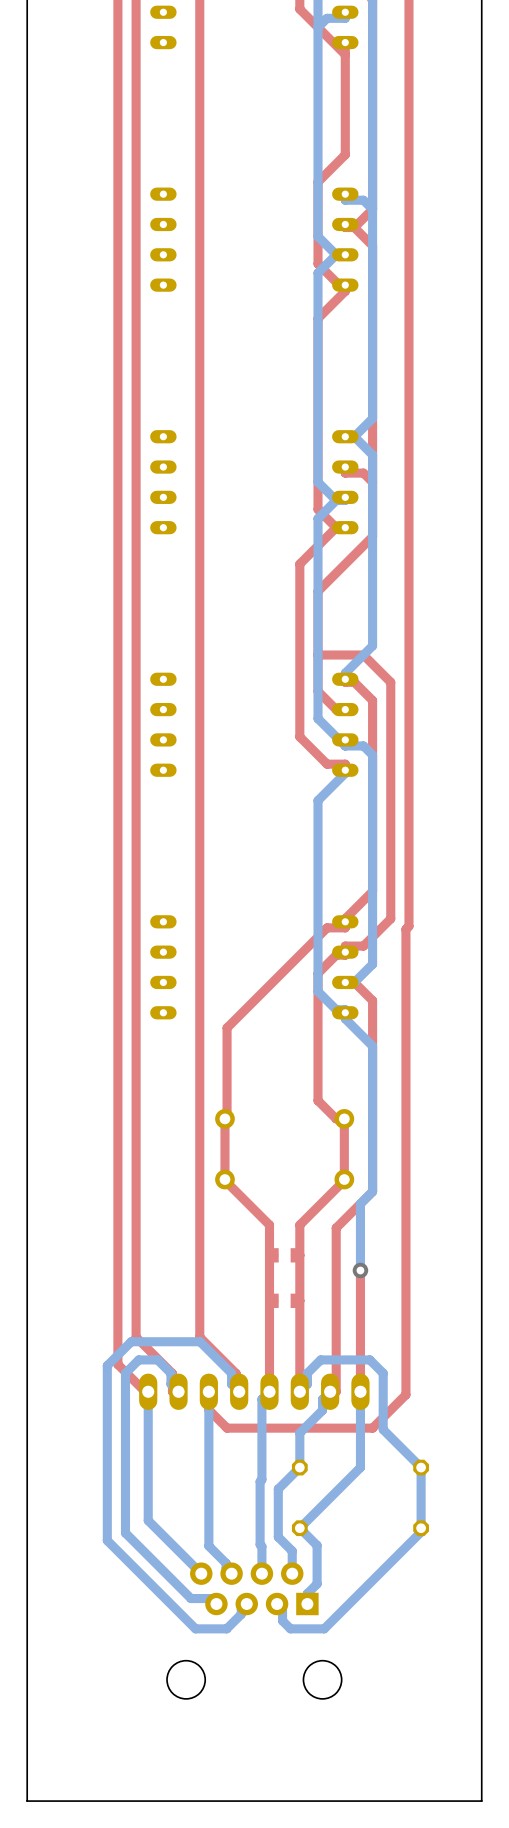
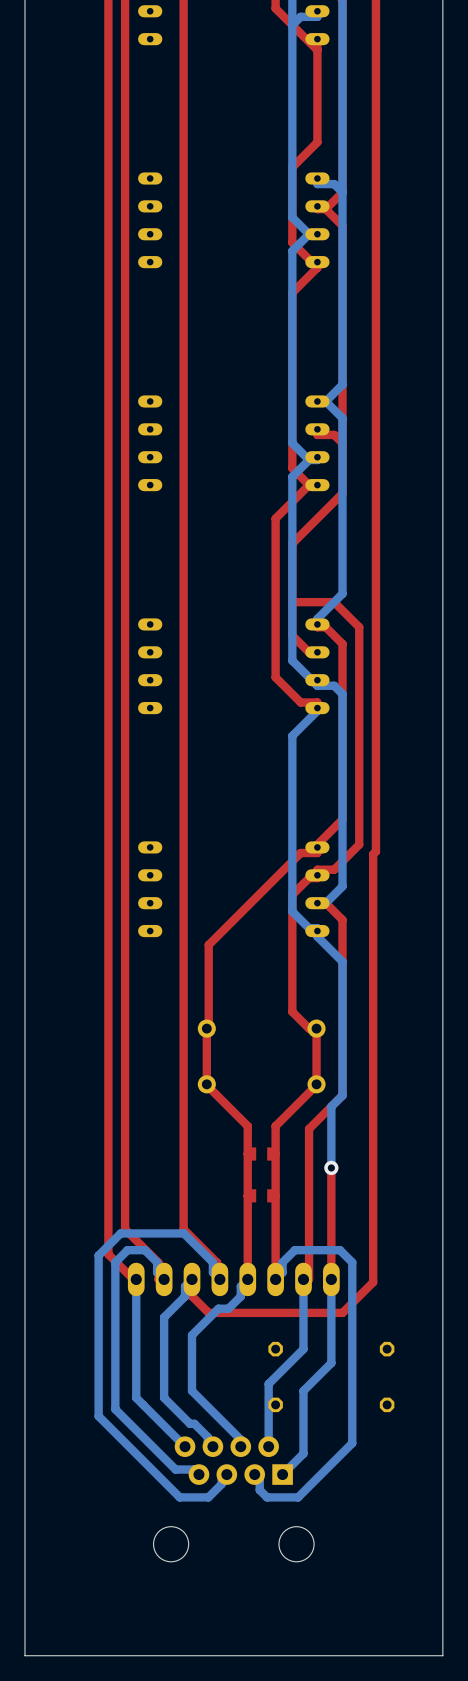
bottom track: (208, 1391) (208, 1452) -> (240, 1296) (228, 1308) (218, 1308) (192, 1335)
bottom track: none -> (192, 1279) (185, 1286) (185, 1296) (164, 1317) (164, 1397) (190, 1423) (194, 1423)
bottom track: (330, 1391) (322, 1399) (322, 1410) (299, 1433) (299, 1467) (278, 1489) (278, 1537) (292, 1551) -> (303, 1279) (303, 1349) (268, 1383) (268, 1425)
bottom track: (261, 1410) (261, 1479) (260, 1481) (261, 1566) -> none
bottom track: (383, 1429) (421, 1467) (421, 1532) (383, 1569) -> (352, 1314) (352, 1443)
bottom track: (360, 1467) (299, 1528) (317, 1545) (317, 1583) (307, 1593) (307, 1604) -> (331, 1349) (331, 1363) (303, 1390) (303, 1453) (282, 1474)
bottom track: (208, 1513) (208, 1546) (211, 1548) -> (192, 1390) (240, 1439)

